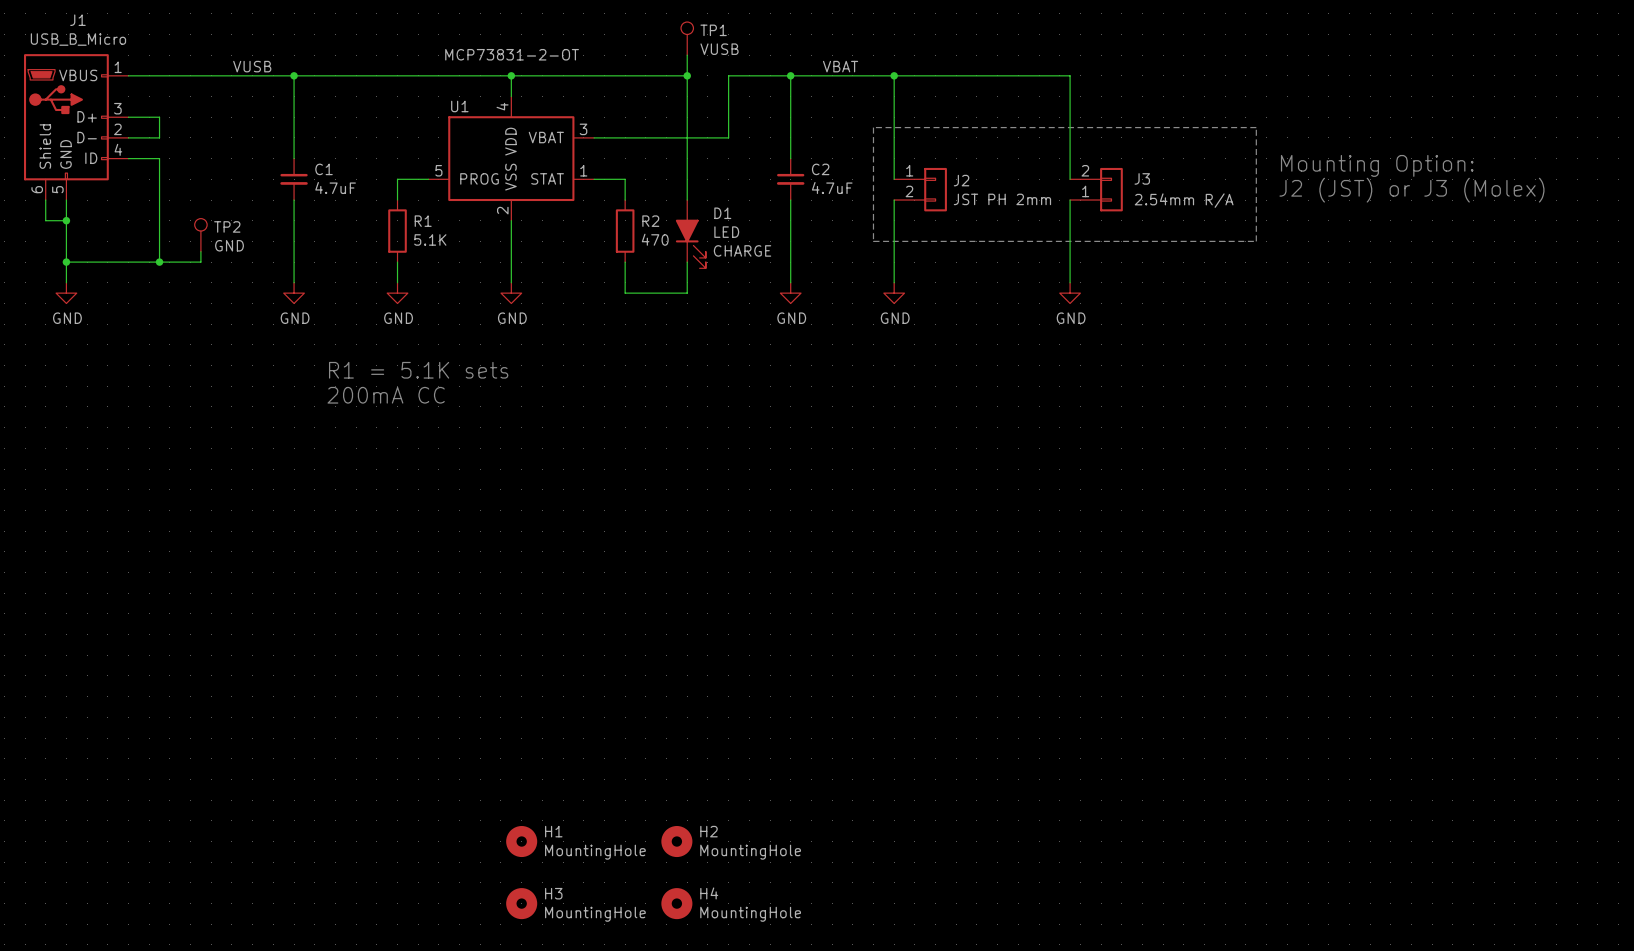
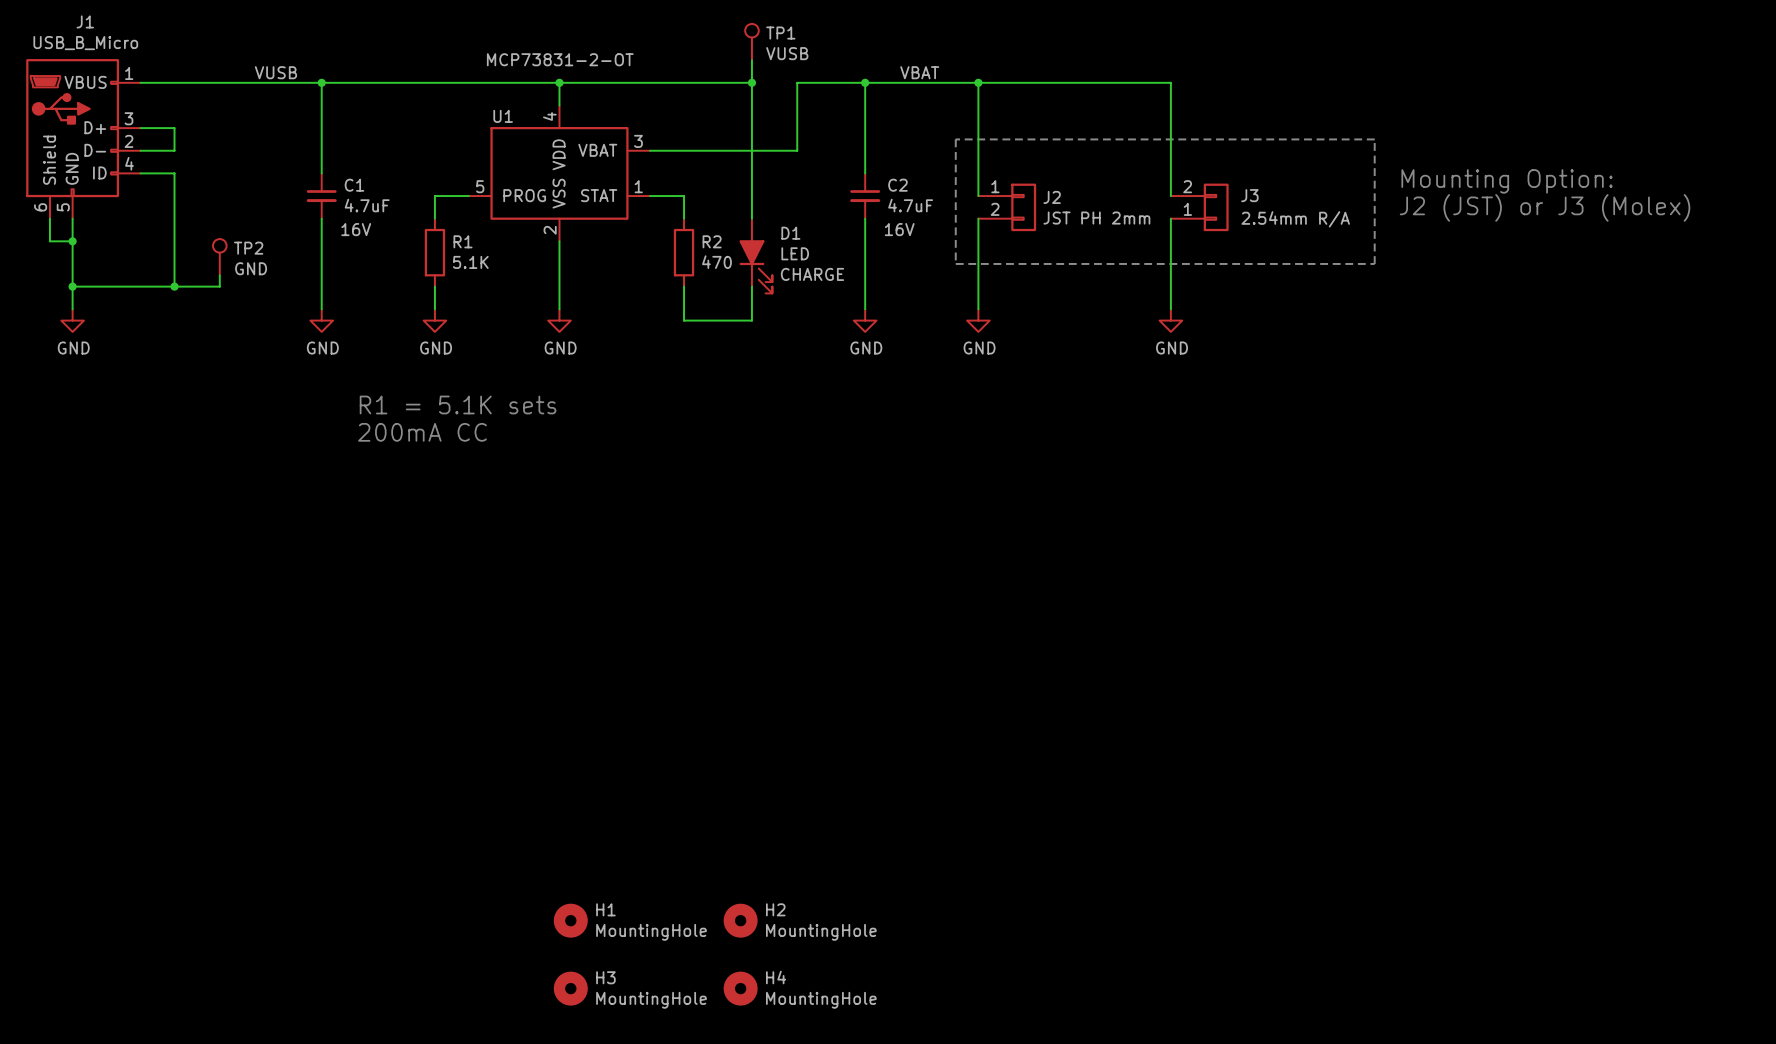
C1 text: none -> 16V (356, 229)
C2 text: none -> 16V (899, 229)

